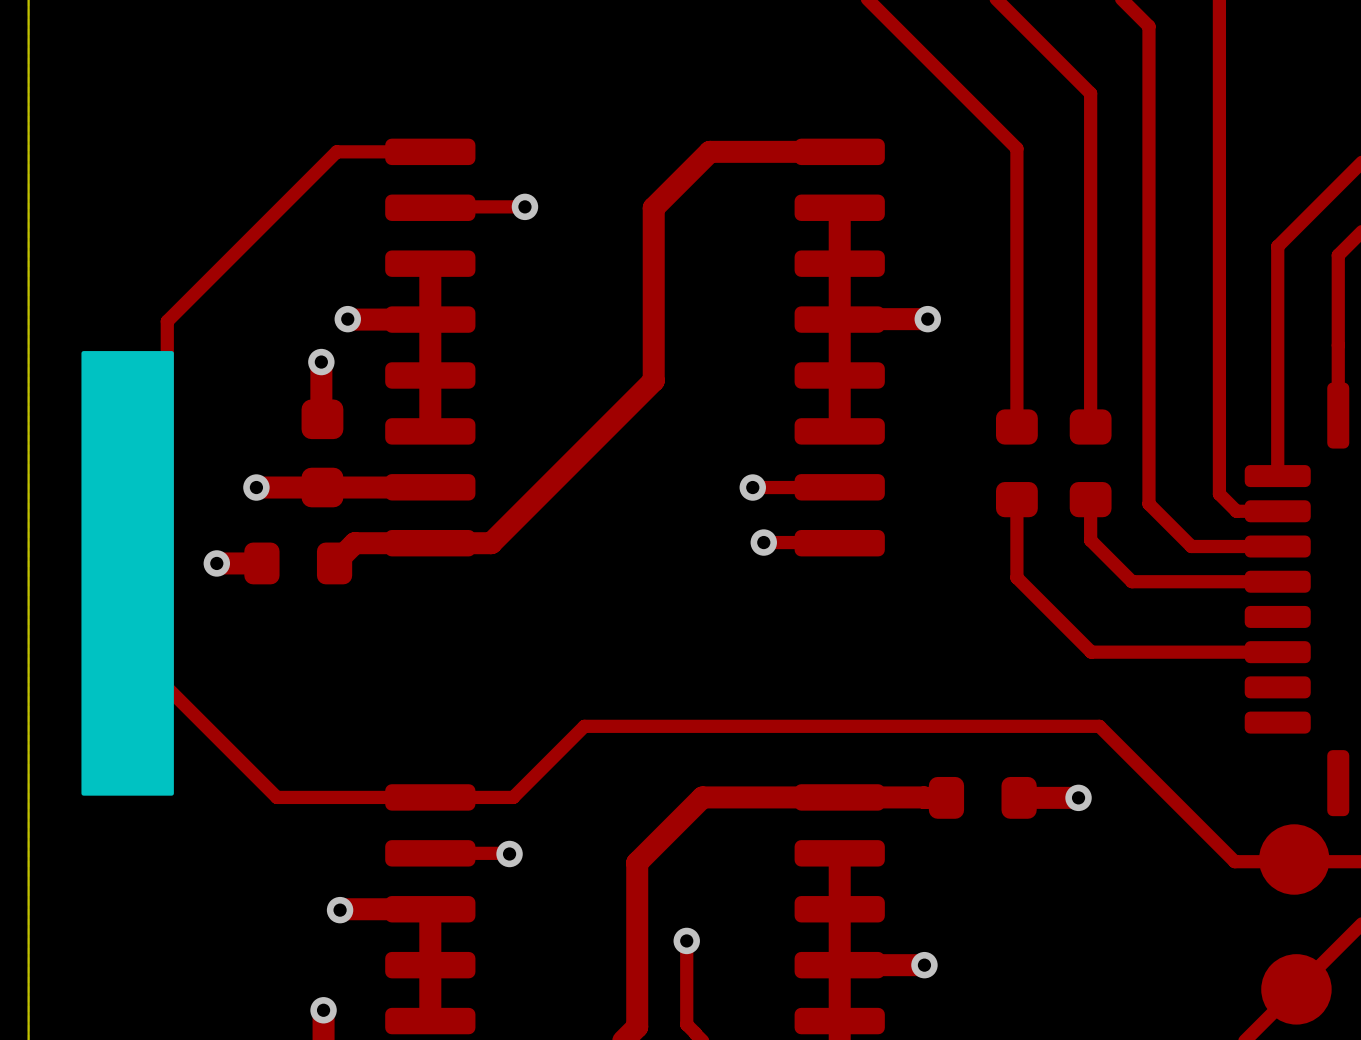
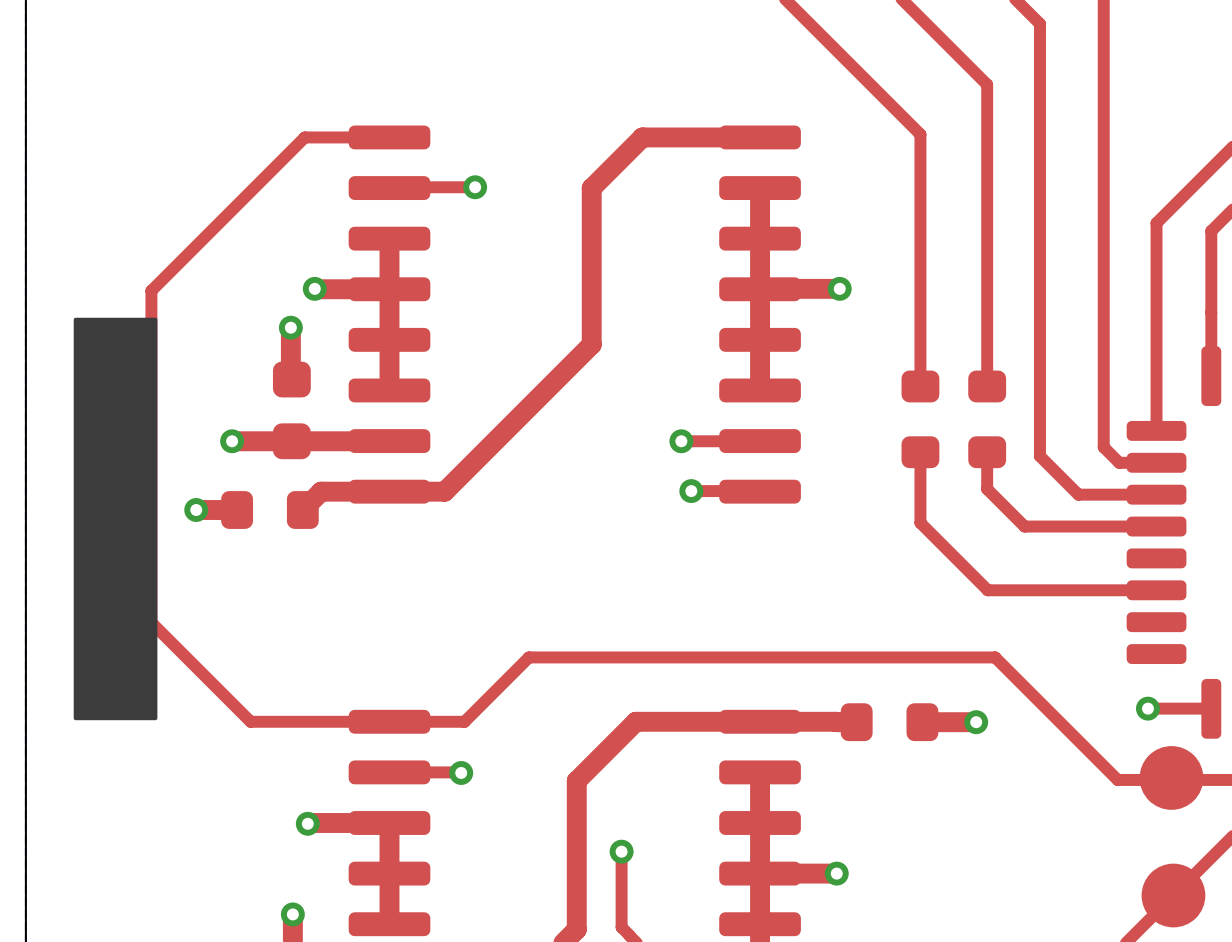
via: none -> (1147, 708)
top track: none -> (1211, 708) (1147, 708)

